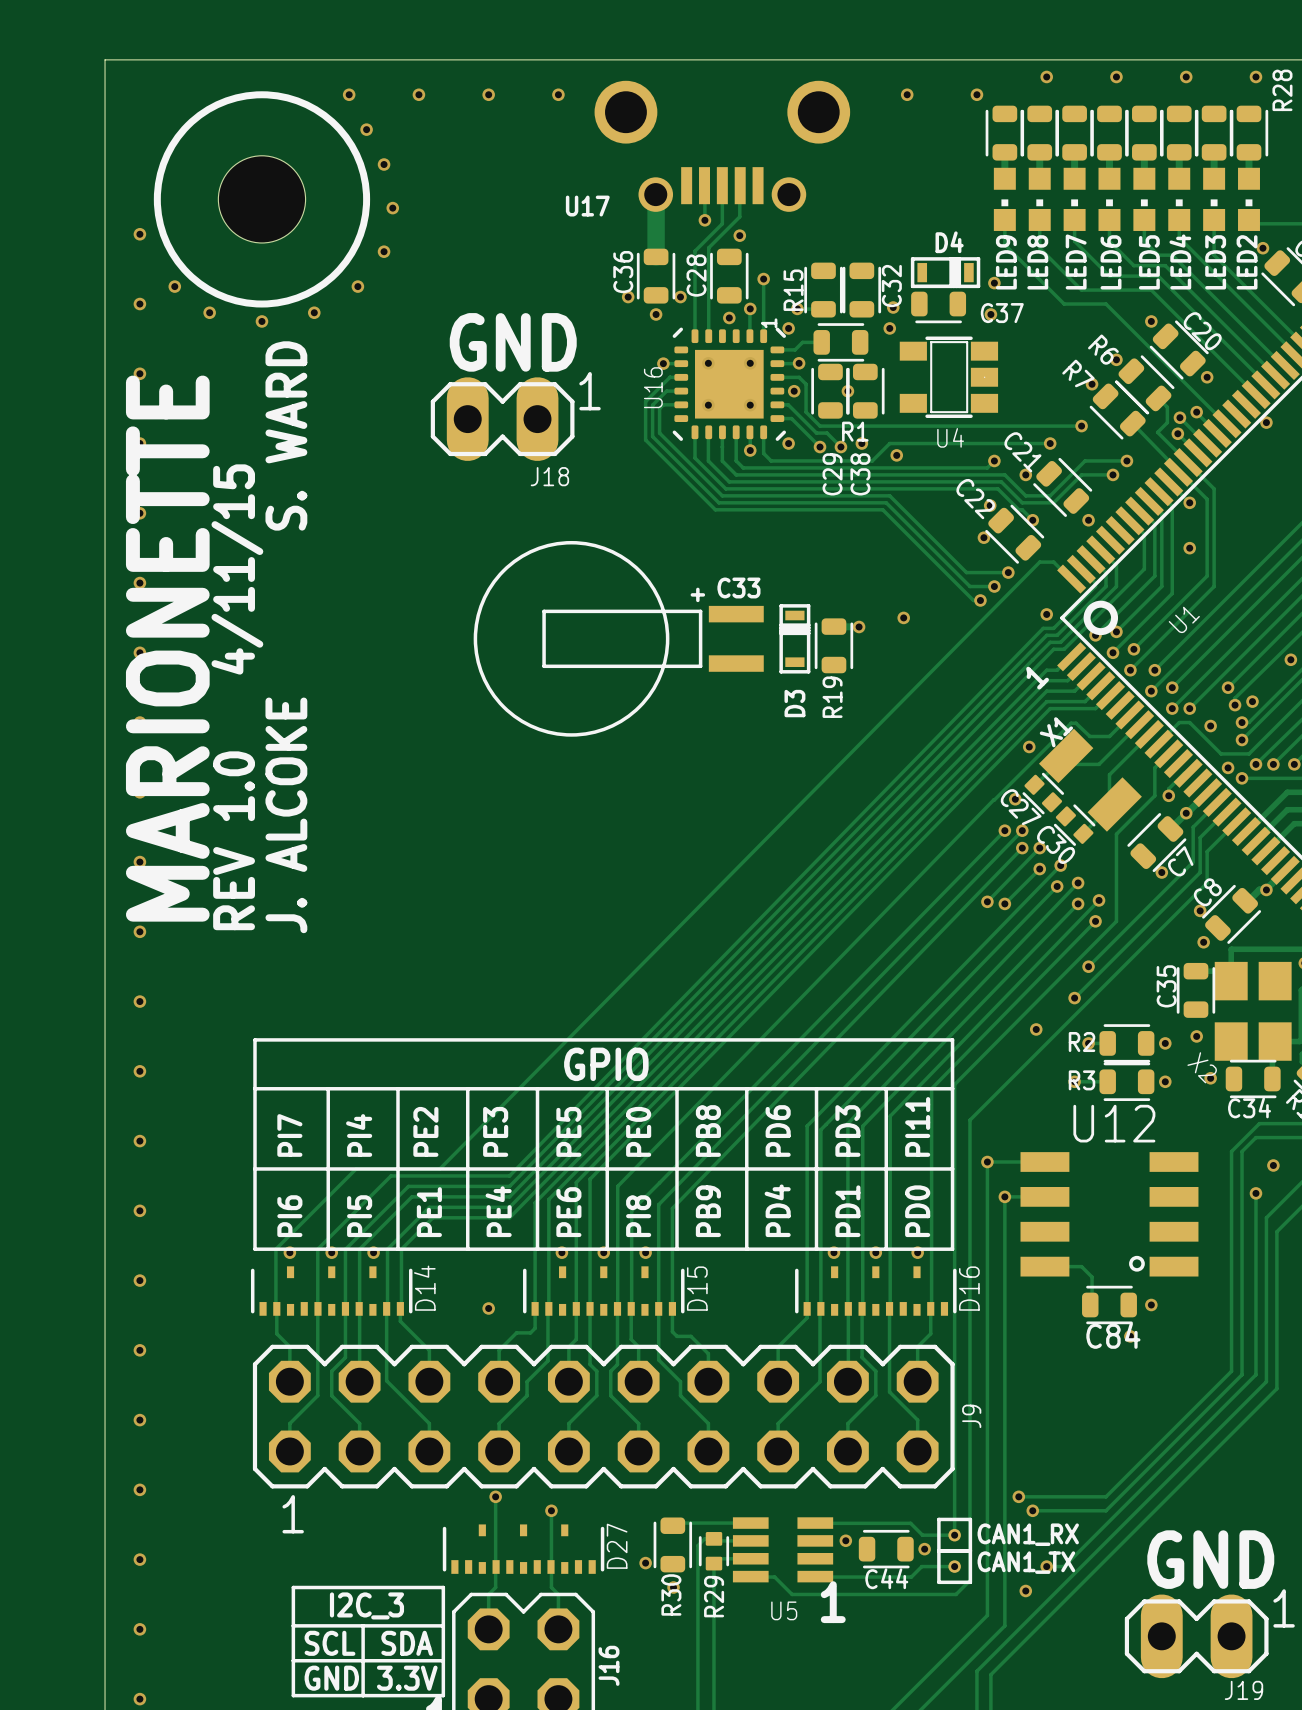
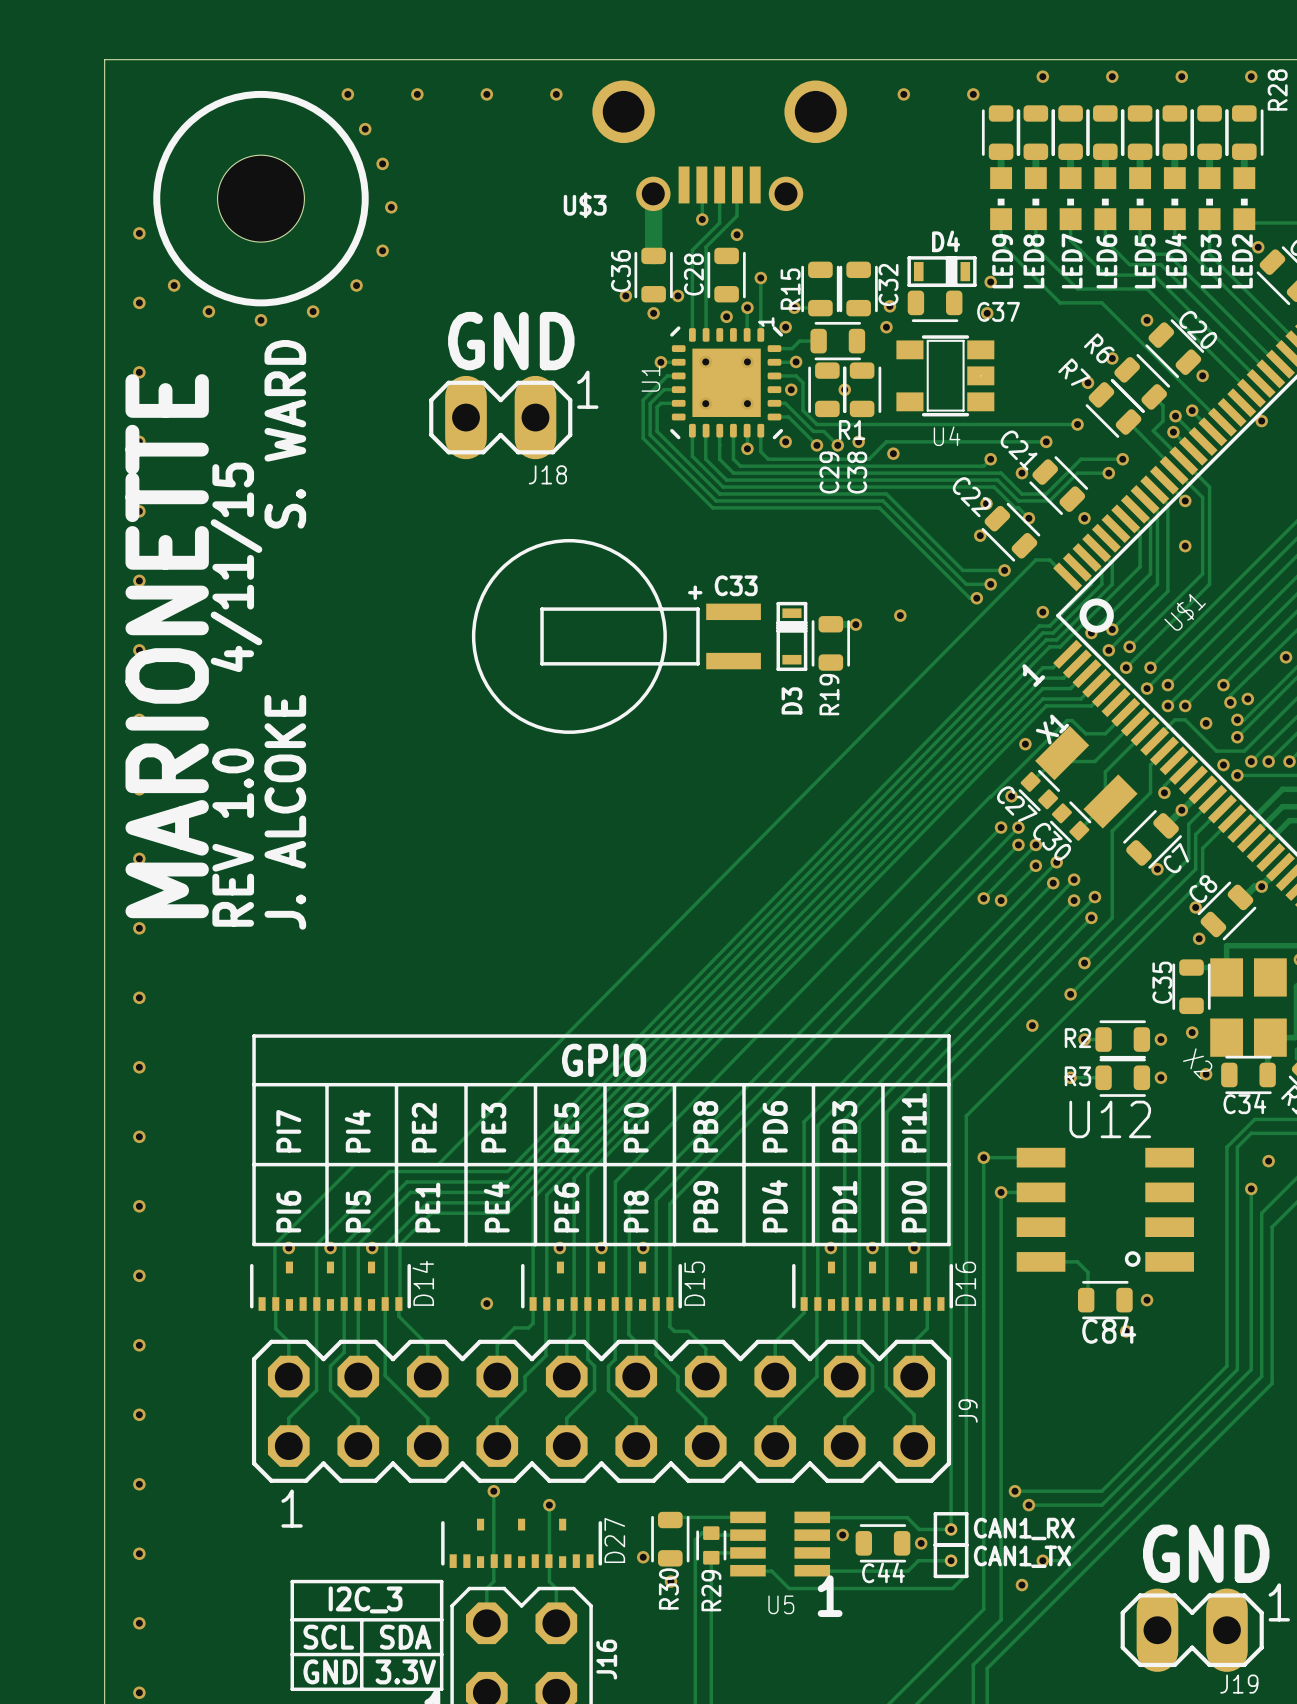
U17 name: U17 (587, 206) -> U$3 (585, 205)
U16 name: U16 (653, 387) -> U1 (650, 378)
U1 name: U1 (1184, 619) -> U$1 (1185, 612)

